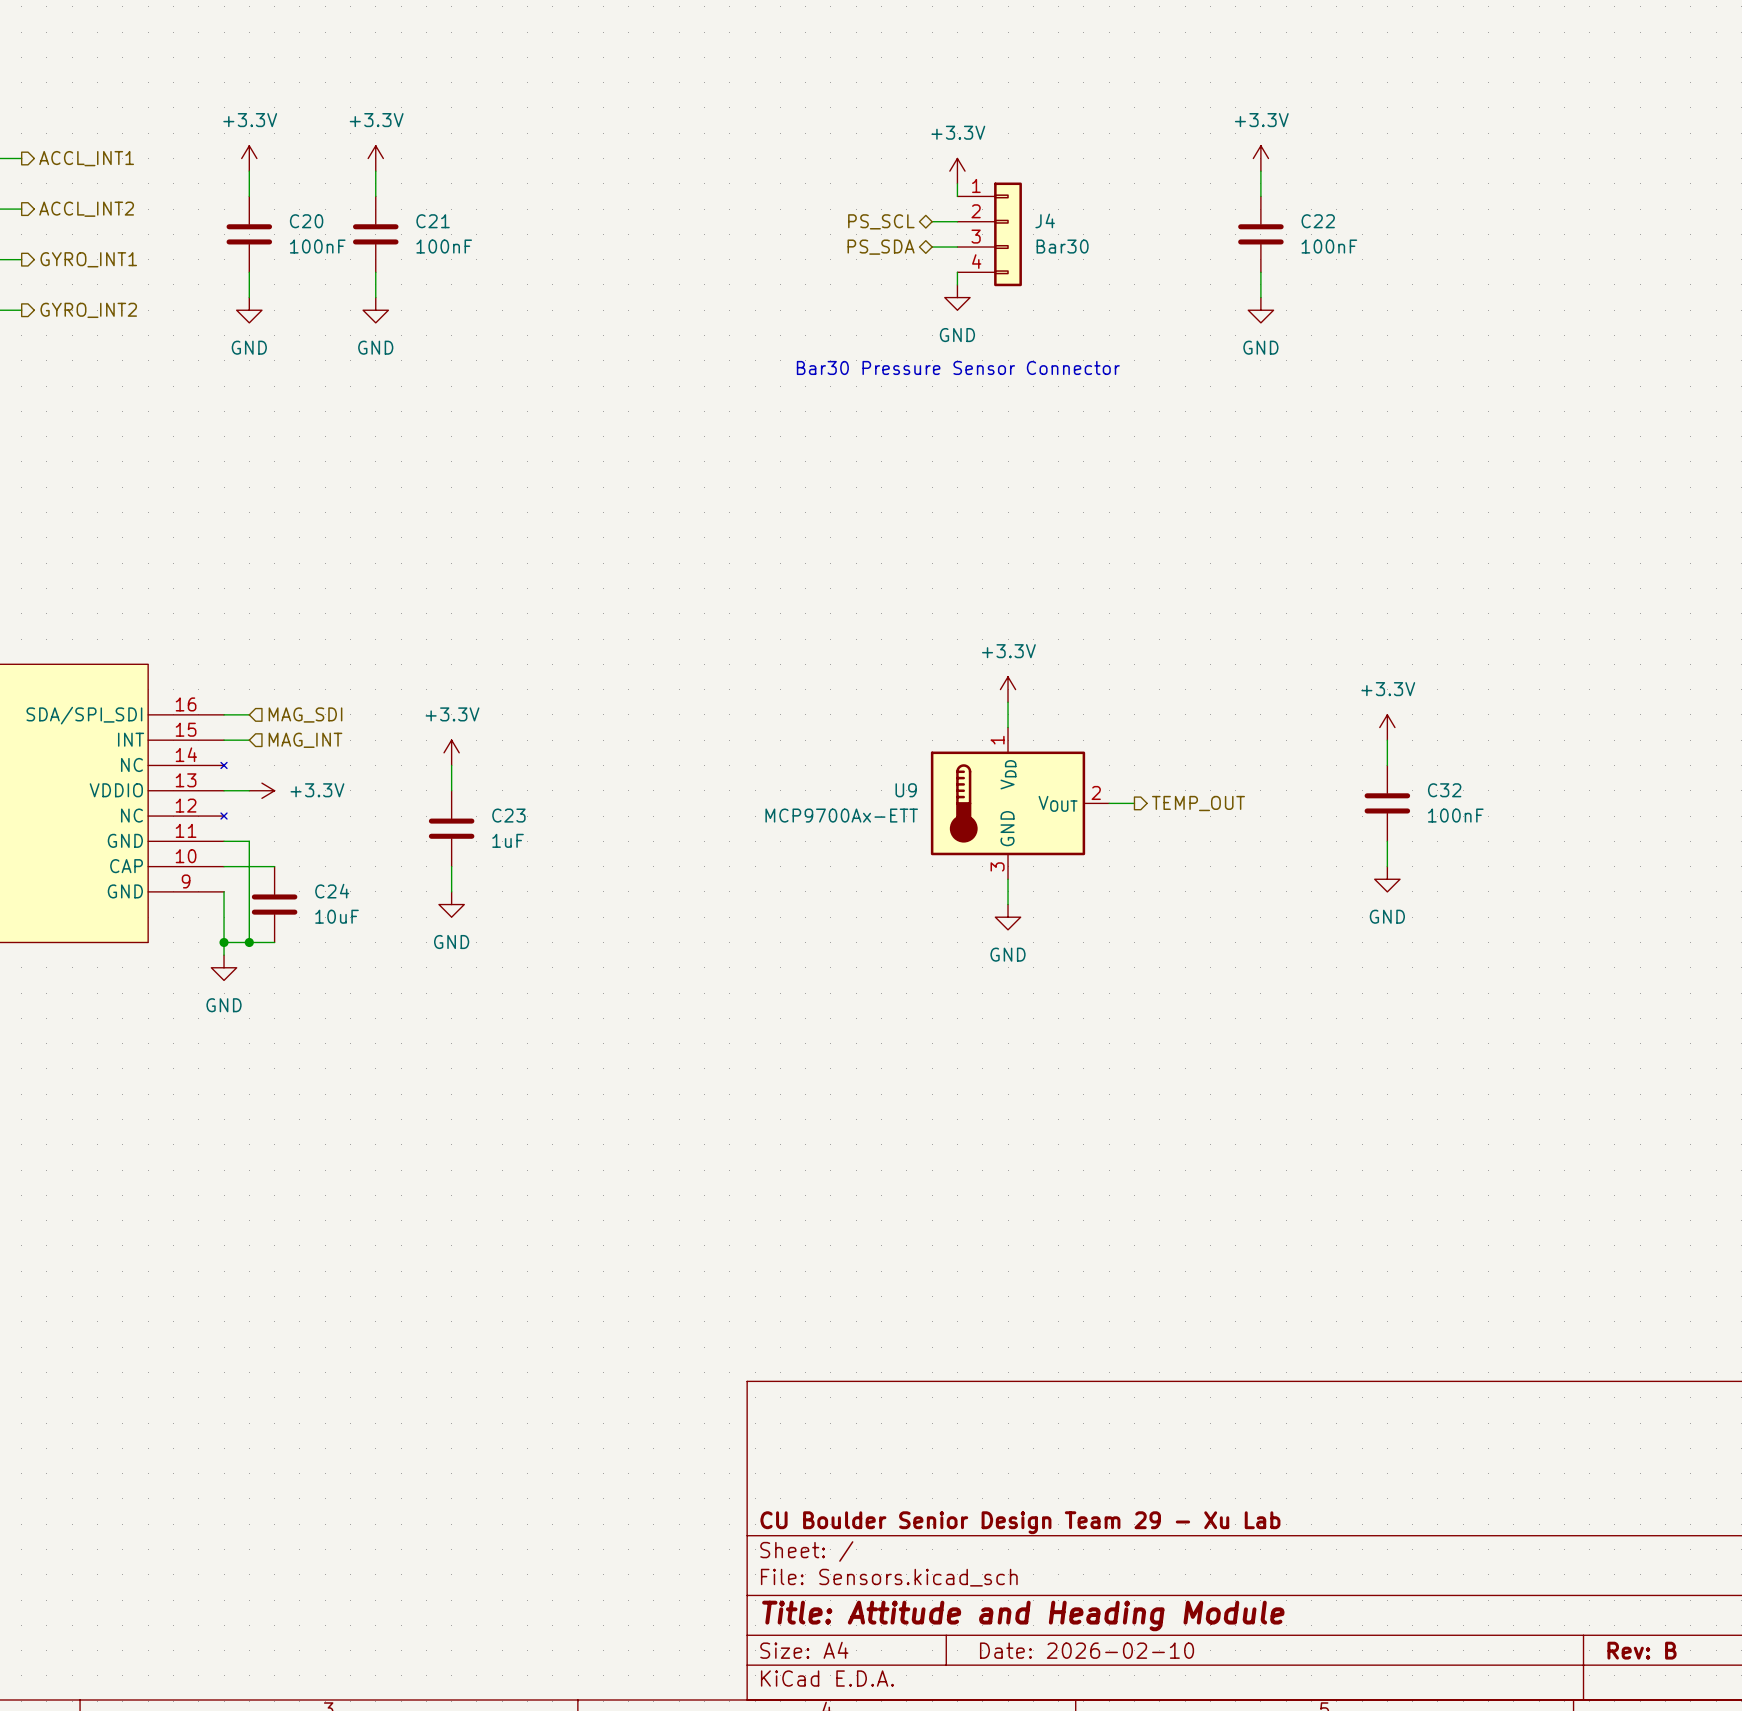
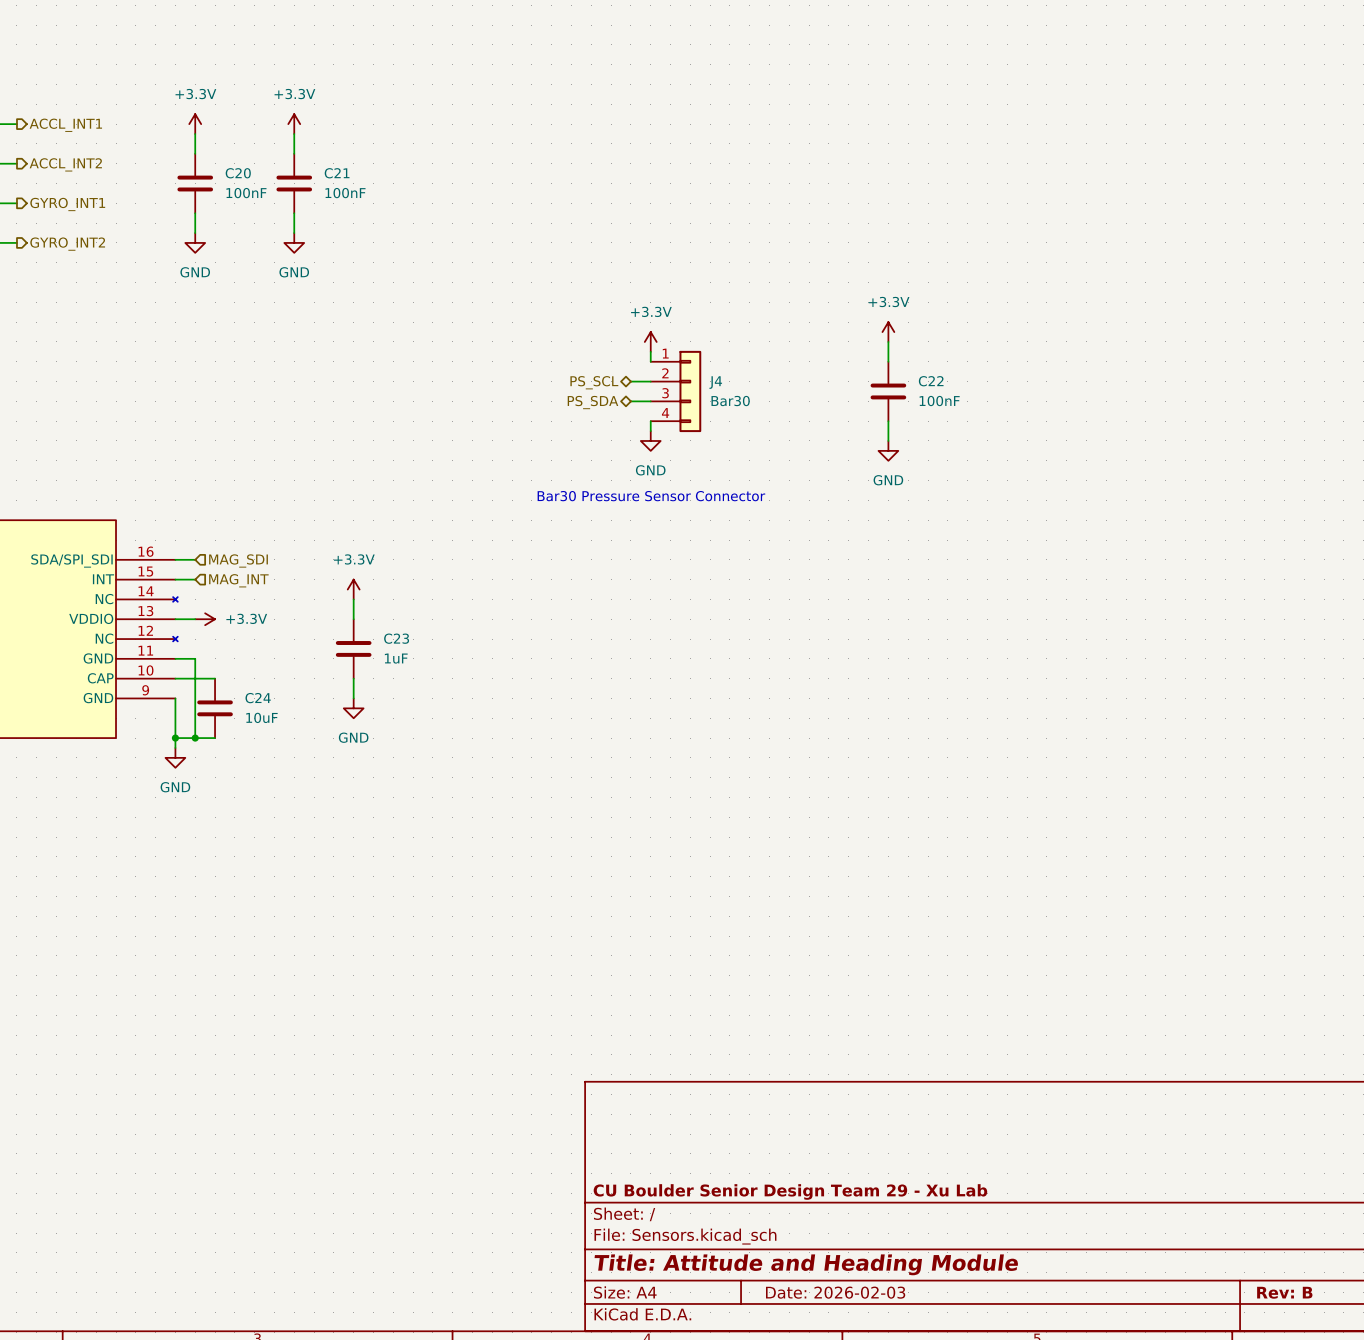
power symbol: +3.3V (1260, 158) -> none
power symbol: +3.3V (957, 171) -> none
wire: (1260, 171) (1260, 196) -> none
wire: (957, 183) (957, 196) -> none
hierarchical label: PS_SCL (881, 221) -> none
wire: (932, 221) (957, 221) -> none
J4 position: (989, 234) -> (675, 391)
C22 position: (1260, 234) -> (888, 391)
hierarchical label: PS_SDA (881, 247) -> none
wire: (932, 247) (957, 247) -> none
wire: (957, 272) (957, 284) -> (650, 351) (650, 361)
wire: (1260, 272) (1260, 297) -> (888, 341) (888, 361)
power symbol: GND (957, 297) -> none
power symbol: GND (1260, 310) -> none
text: Bar30 Pressure Sensor Connector (958, 367) -> none
power symbol: none -> +3.3V (888, 332)
power symbol: none -> +3.3V (650, 341)
hierarchical label: none -> PS_SCL (594, 382)
wire: none -> (630, 381) (650, 381)
hierarchical label: none -> PS_SDA (592, 402)
wire: none -> (630, 401) (650, 401)
wire: none -> (650, 421) (650, 431)
power symbol: none -> GND (650, 440)
power symbol: none -> GND (888, 450)
text: none -> Bar30 Pressure Sensor Connector (651, 496)
power symbol: +3.3V (1008, 689) -> none
wire: (1008, 702) (1008, 727) -> (888, 421) (888, 440)
power symbol: +3.3V (1387, 727) -> none
wire: (1387, 740) (1387, 765) -> none
U9: MCP9700Ax-ETT (1020, 803) -> none
wire: (1109, 803) (1134, 803) -> none
hierarchical label: TEMP_OUT (1198, 803) -> none
C32: 100nF (1387, 803) -> none
wire: (1387, 841) (1387, 866) -> none
wire: (1008, 879) (1008, 904) -> none
power symbol: GND (1387, 879) -> none
power symbol: GND (1008, 917) -> none
title block: Date: 2026-02-10 (1087, 1650) -> Date: 2026-02-03 (835, 1292)

